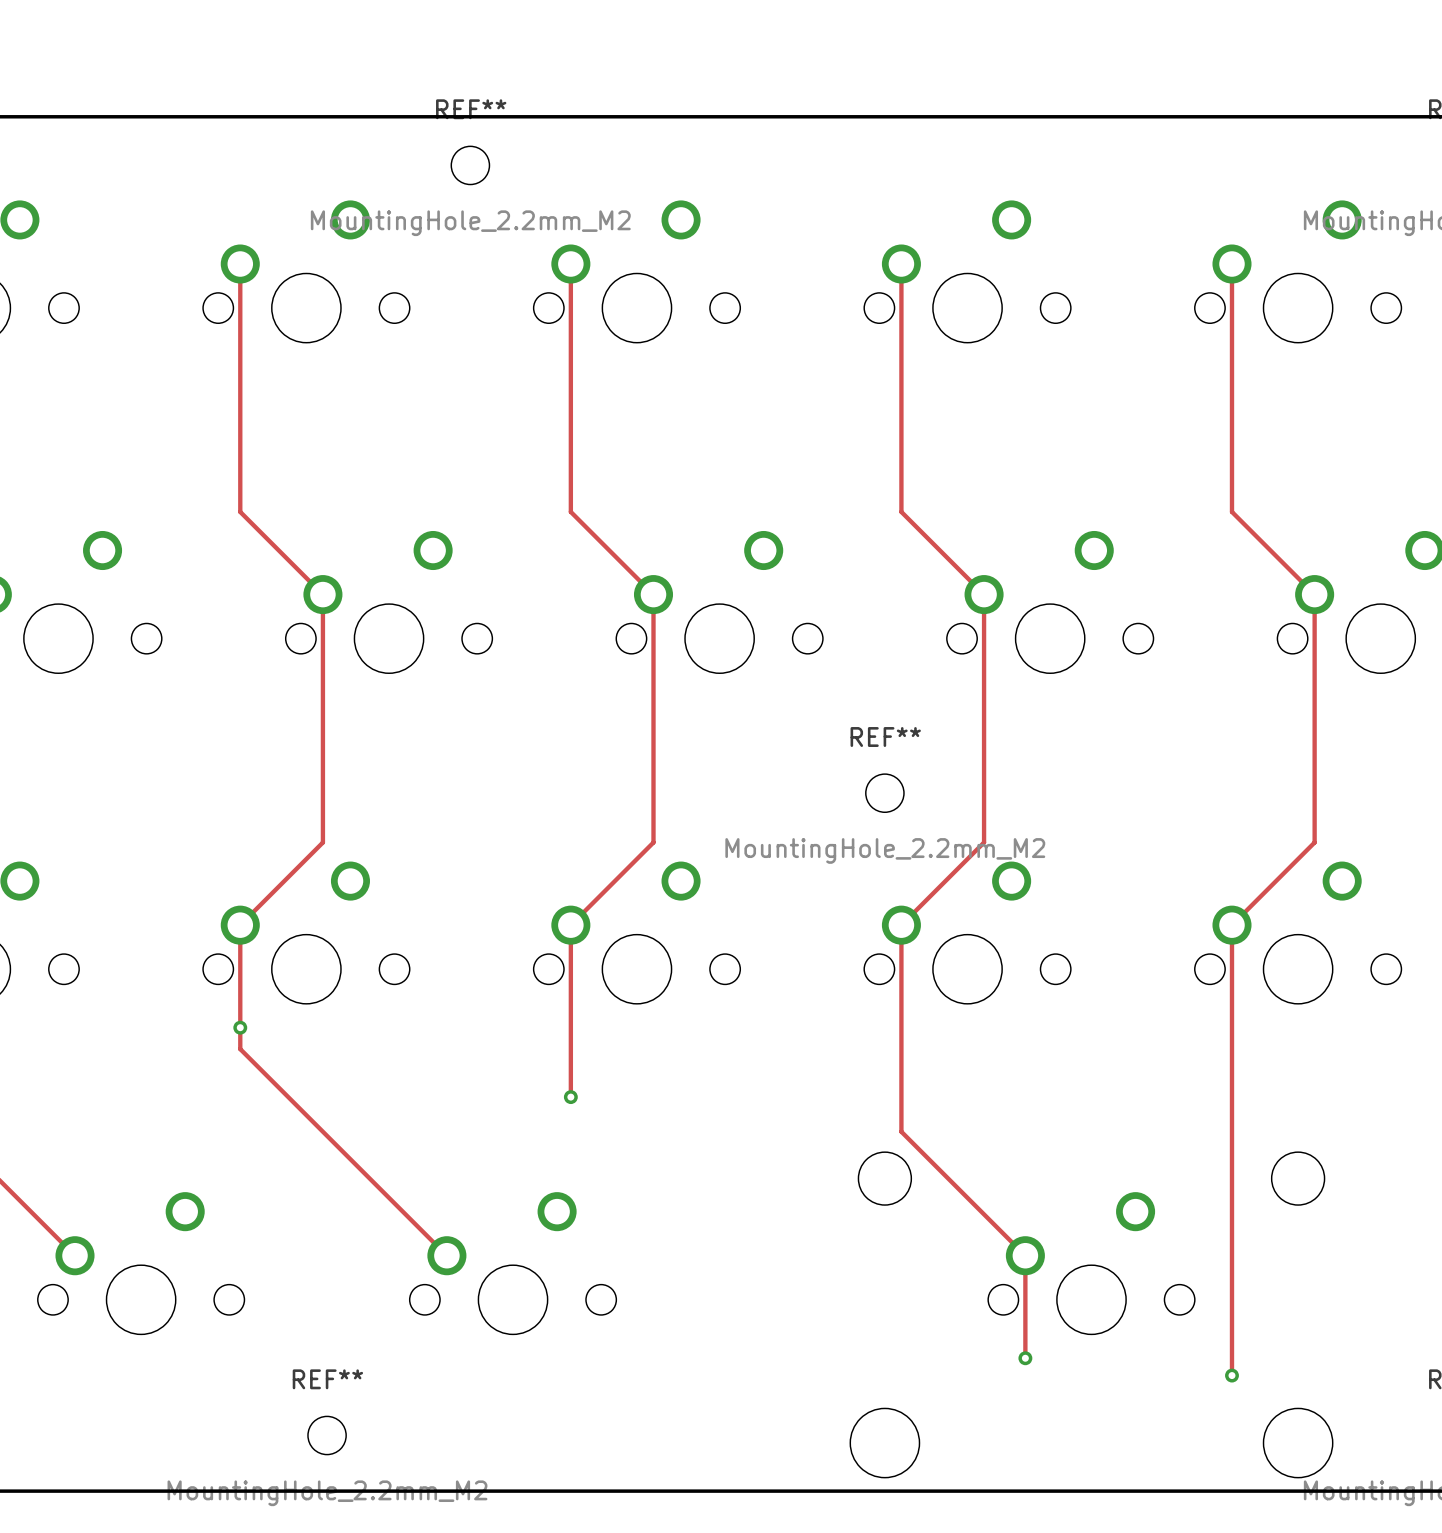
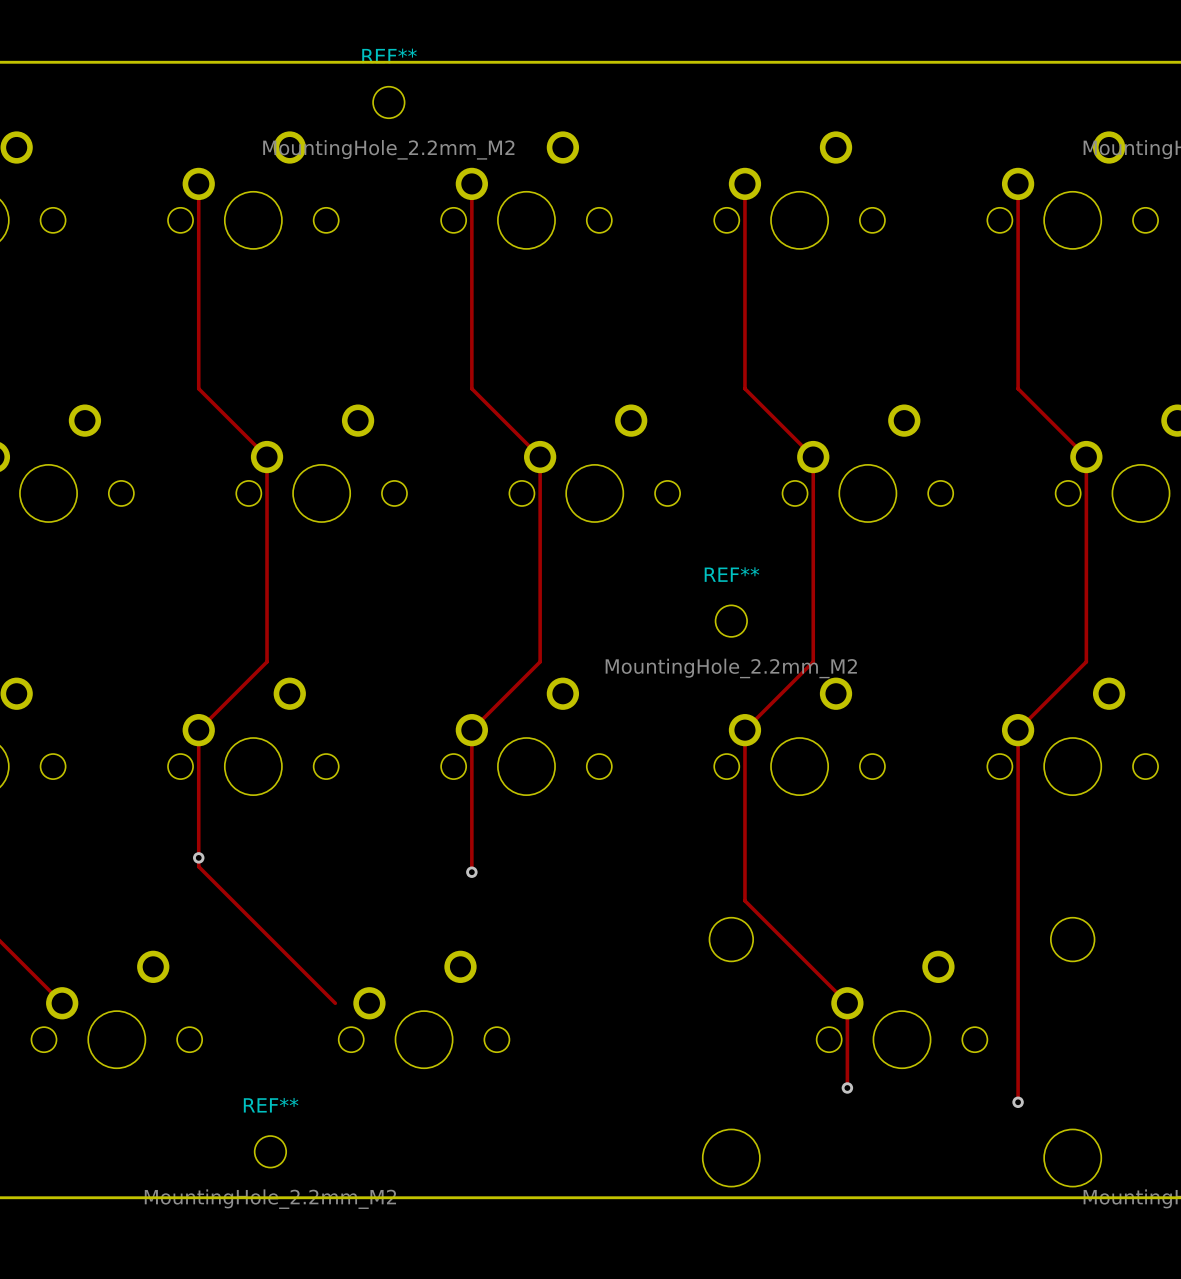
via position: (240, 1027) -> (198, 857)
track: (240, 1049) (446, 1255) -> (198, 832) (198, 866) (335, 1003)

